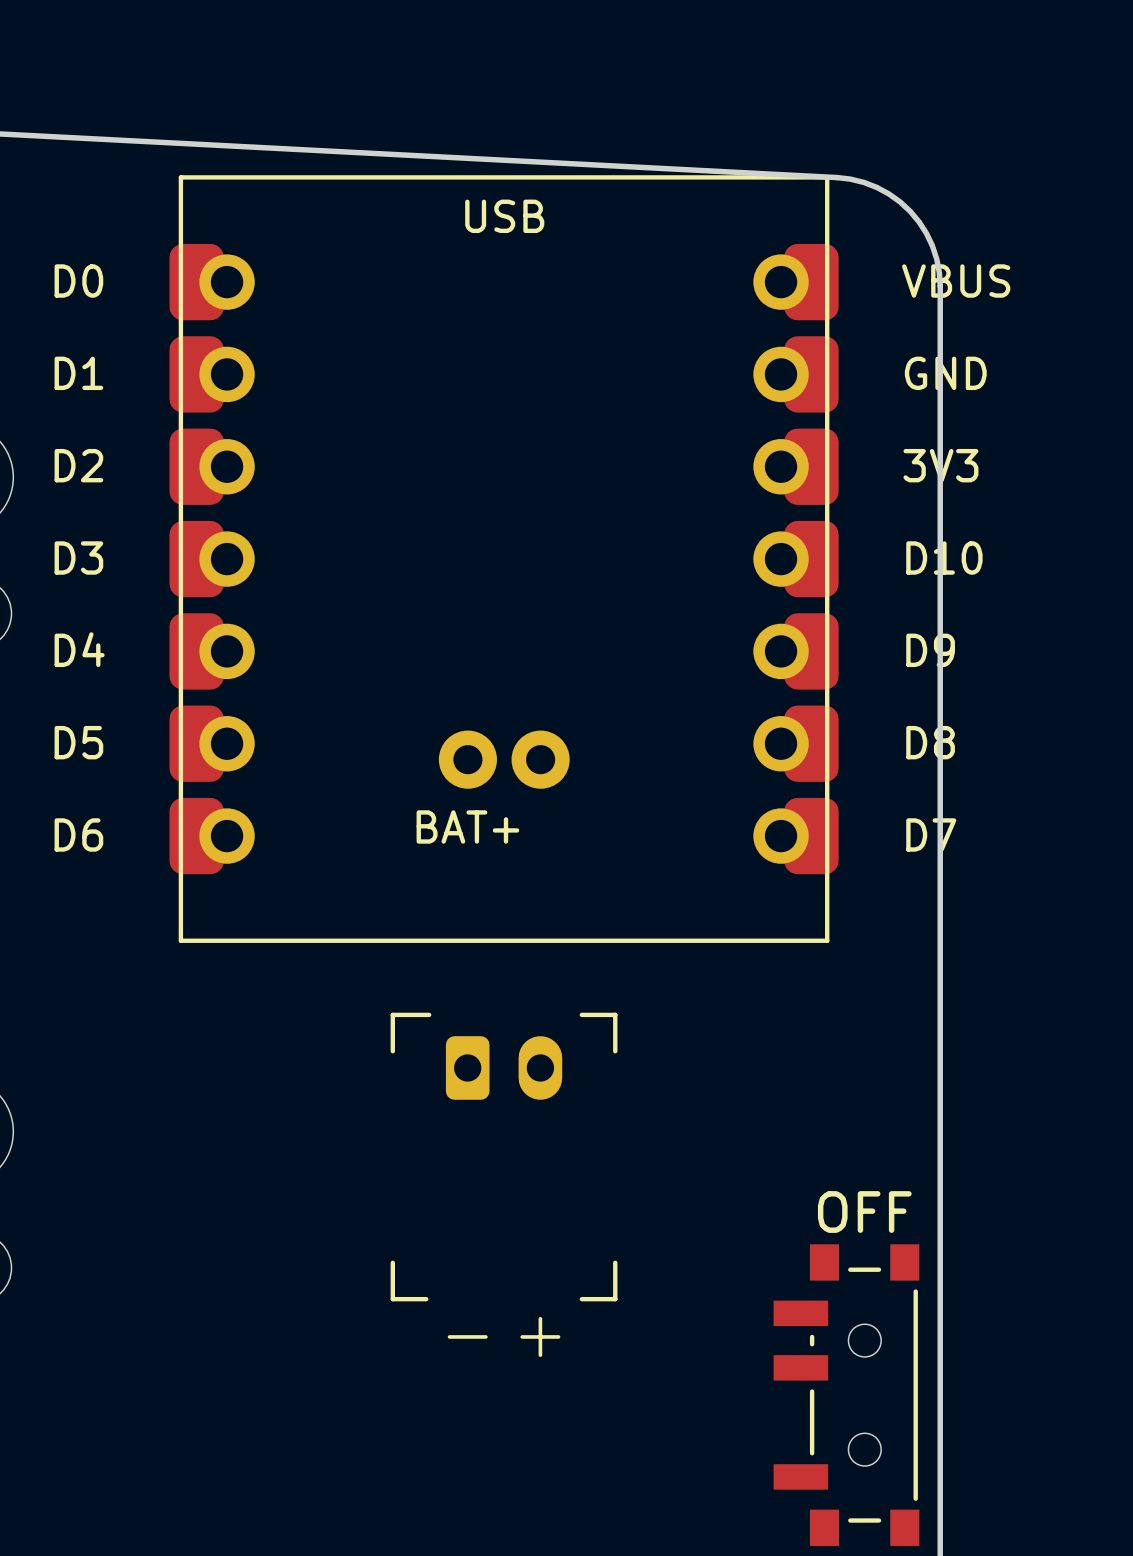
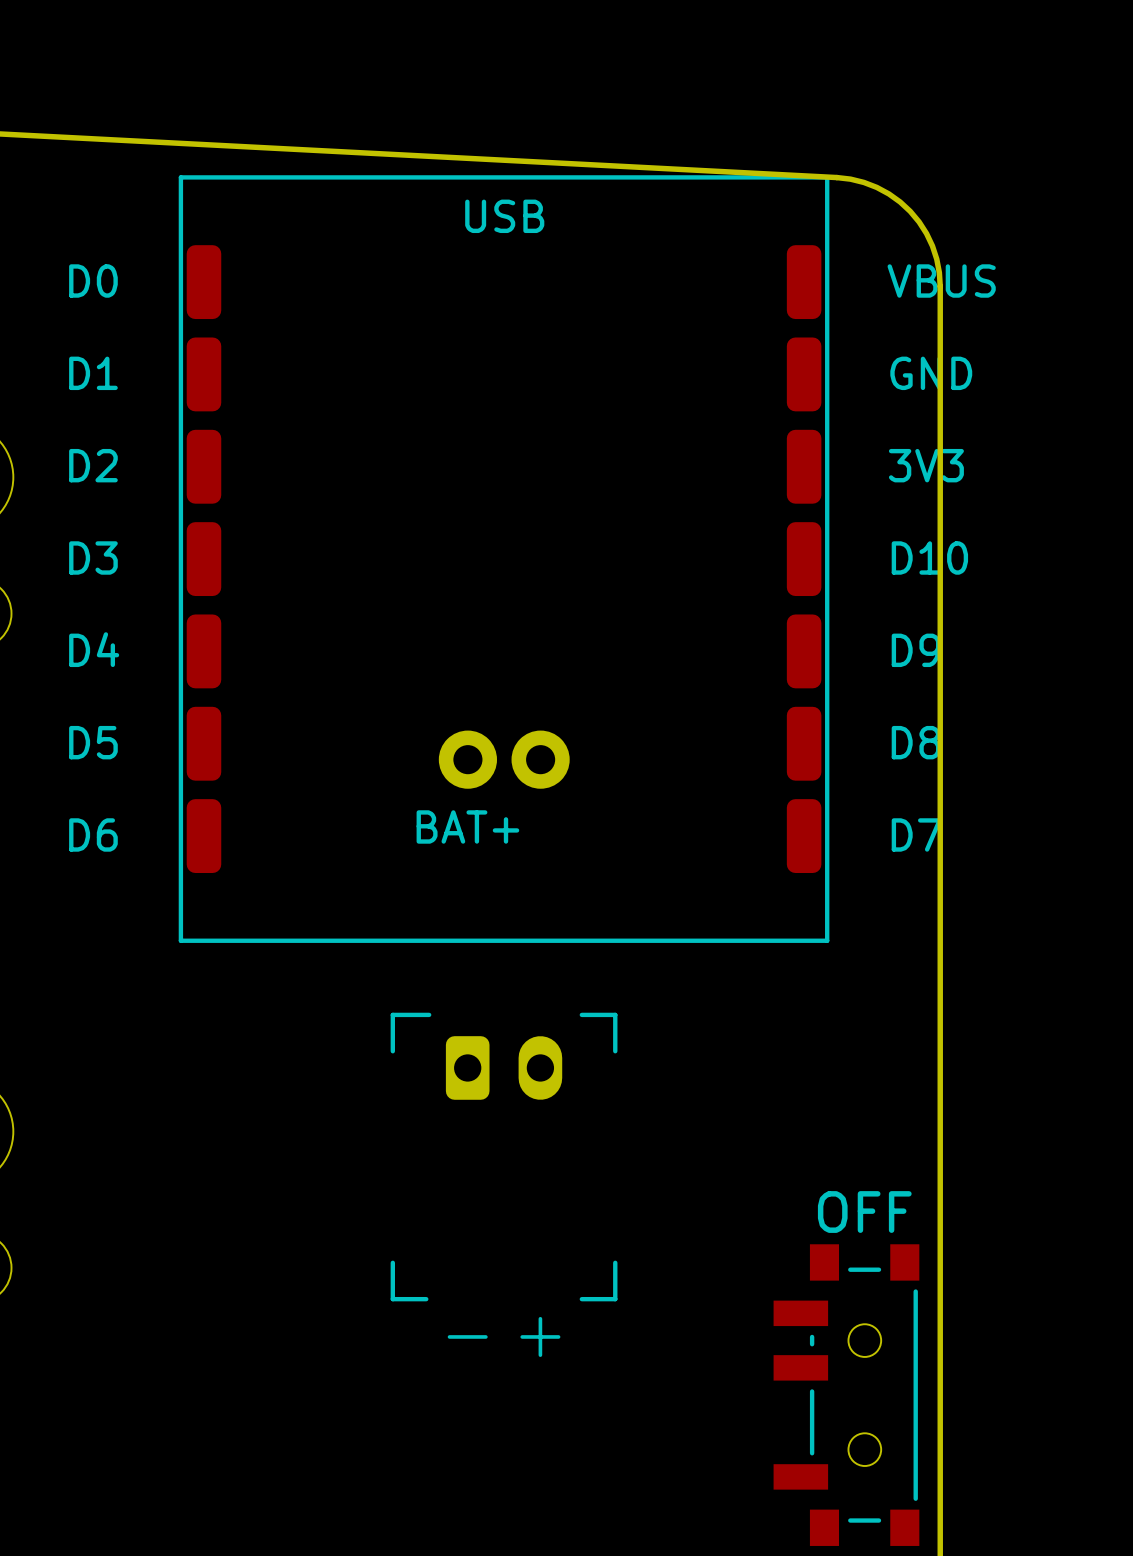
part footprint: [169, 175, 839, 943] -> [178, 175, 830, 943]

